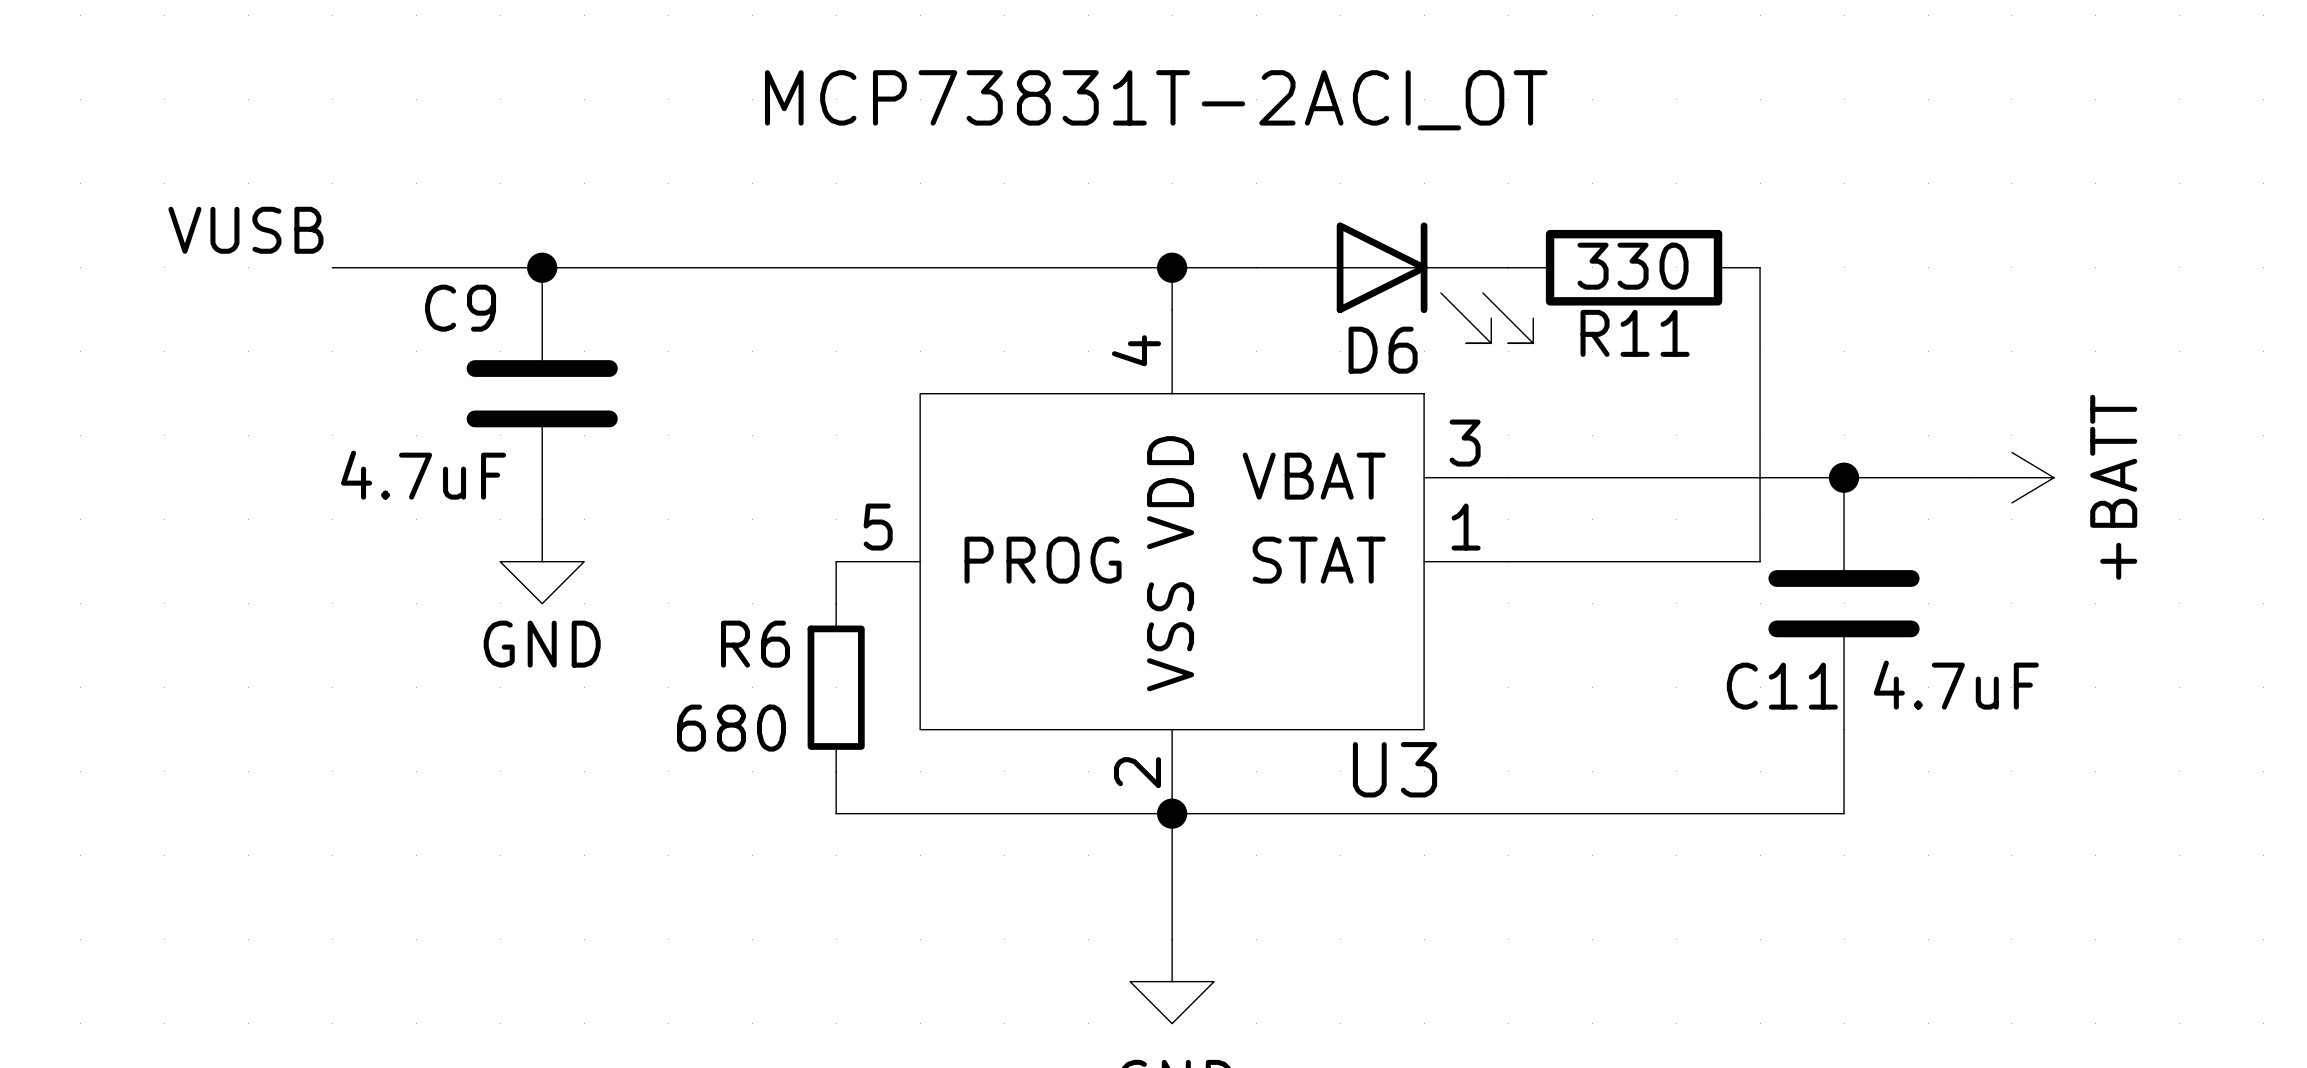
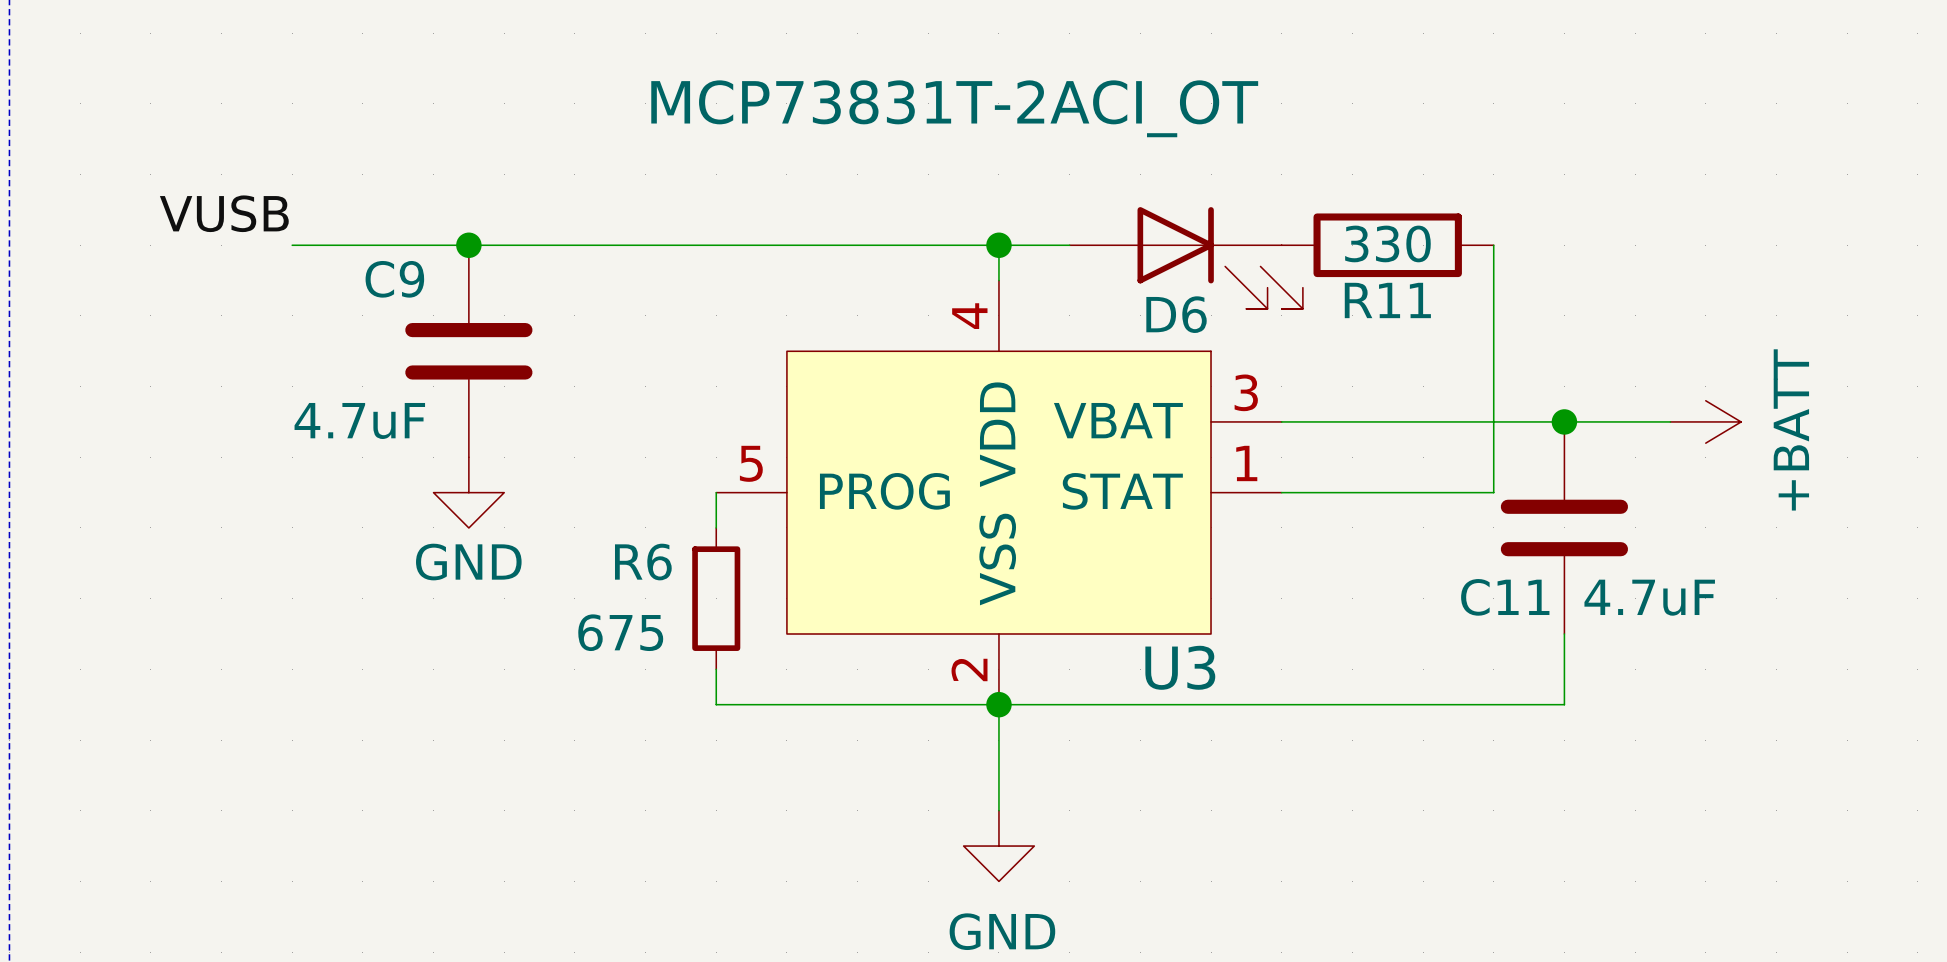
R6 value: 680 (731, 728) -> 675 (620, 632)

